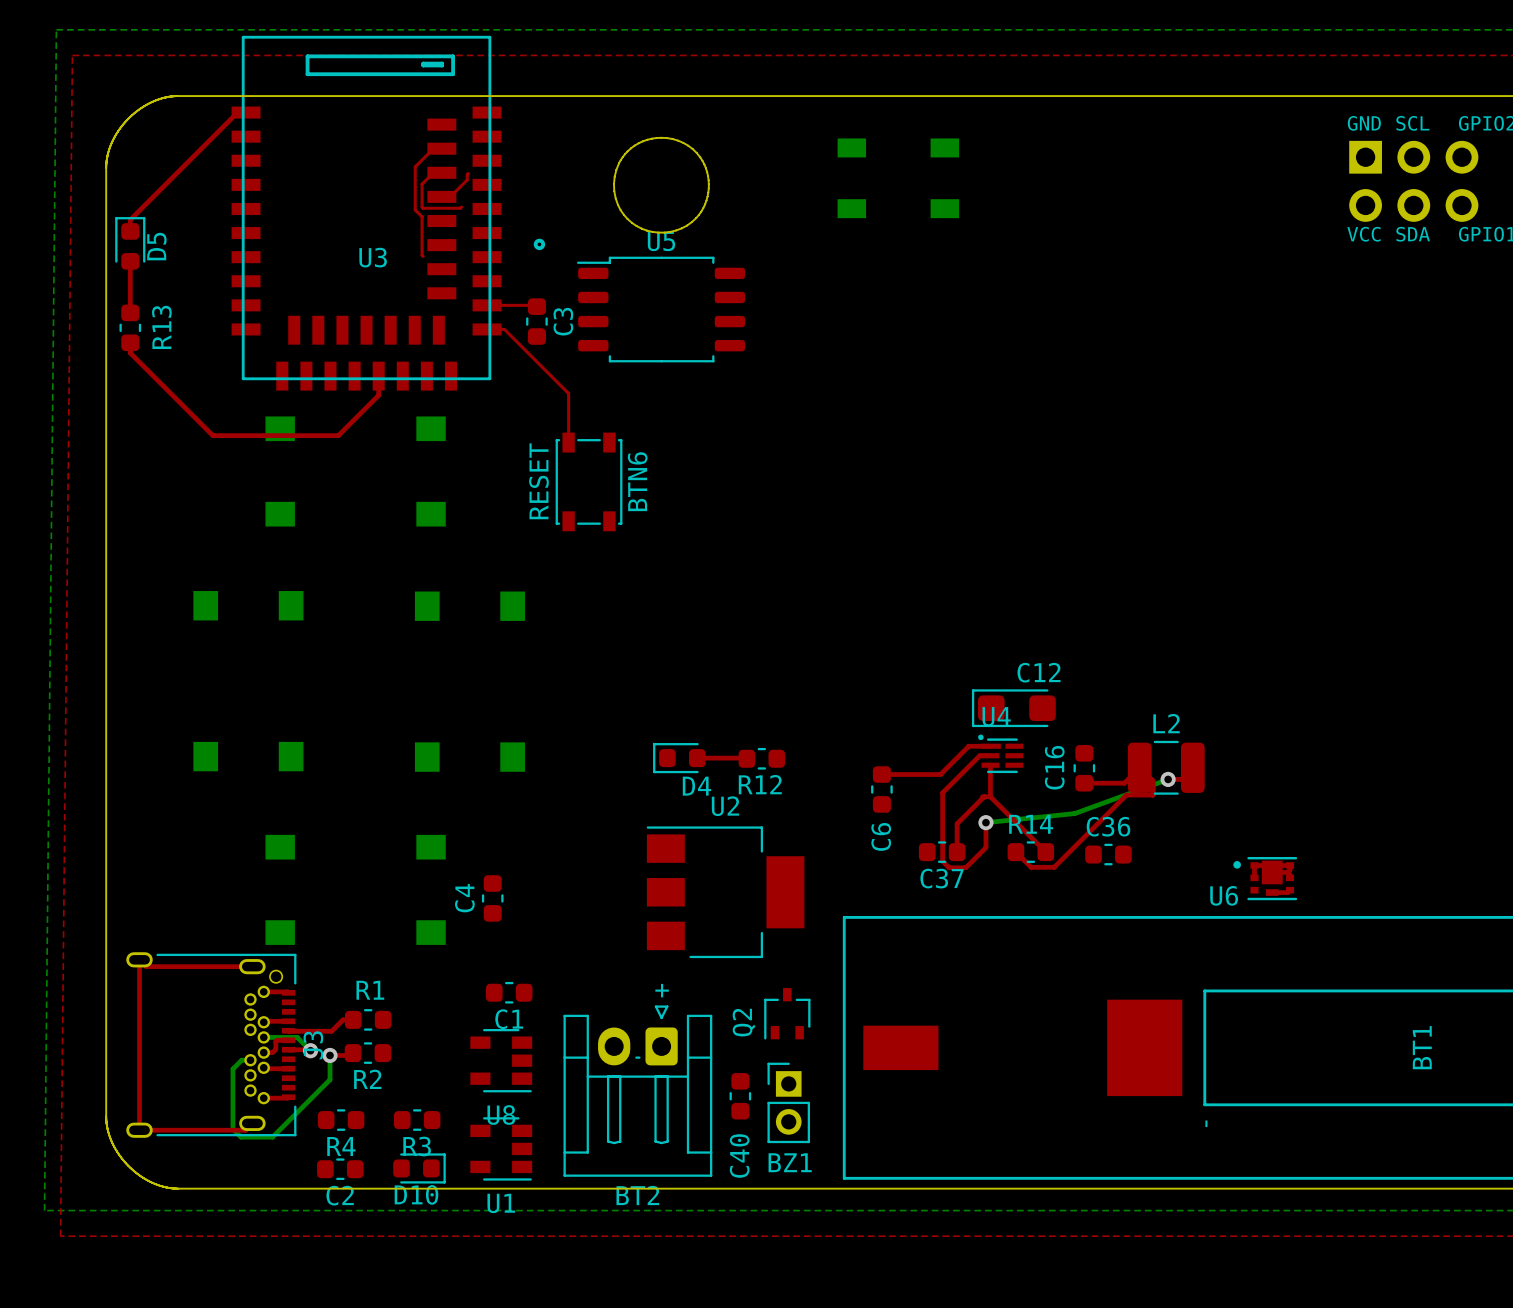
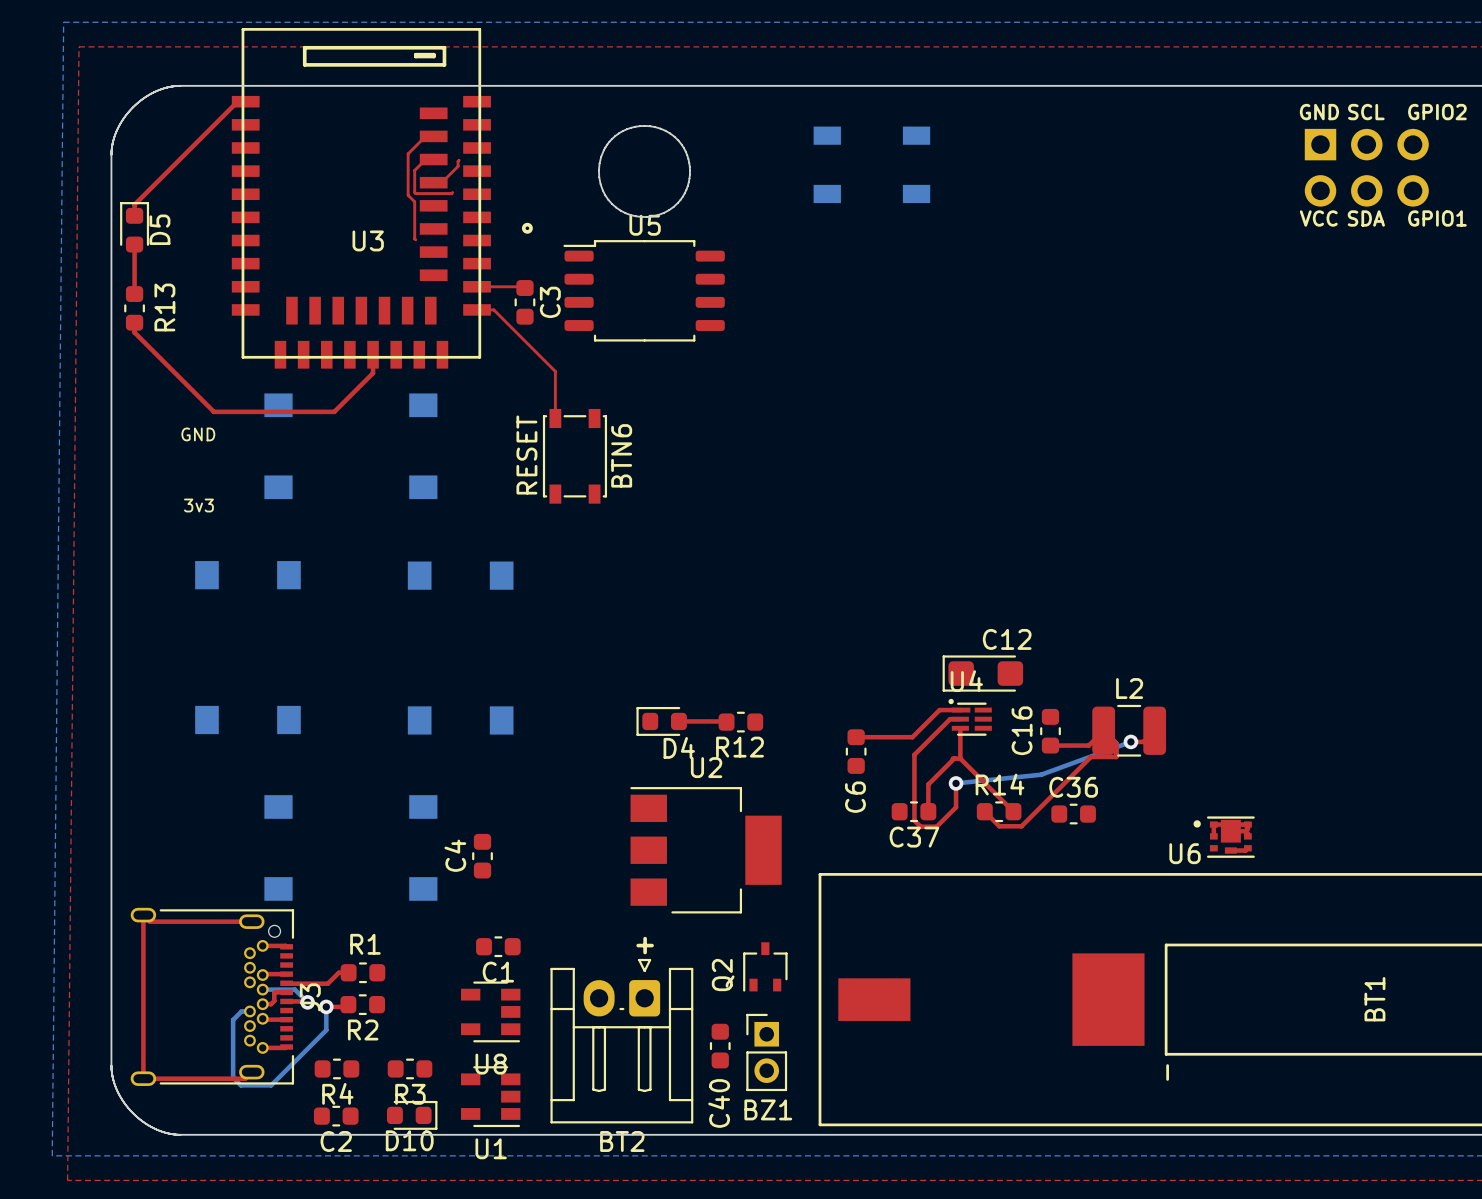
text: none -> GND (198, 434)
text: none -> 3v3 (198, 505)

